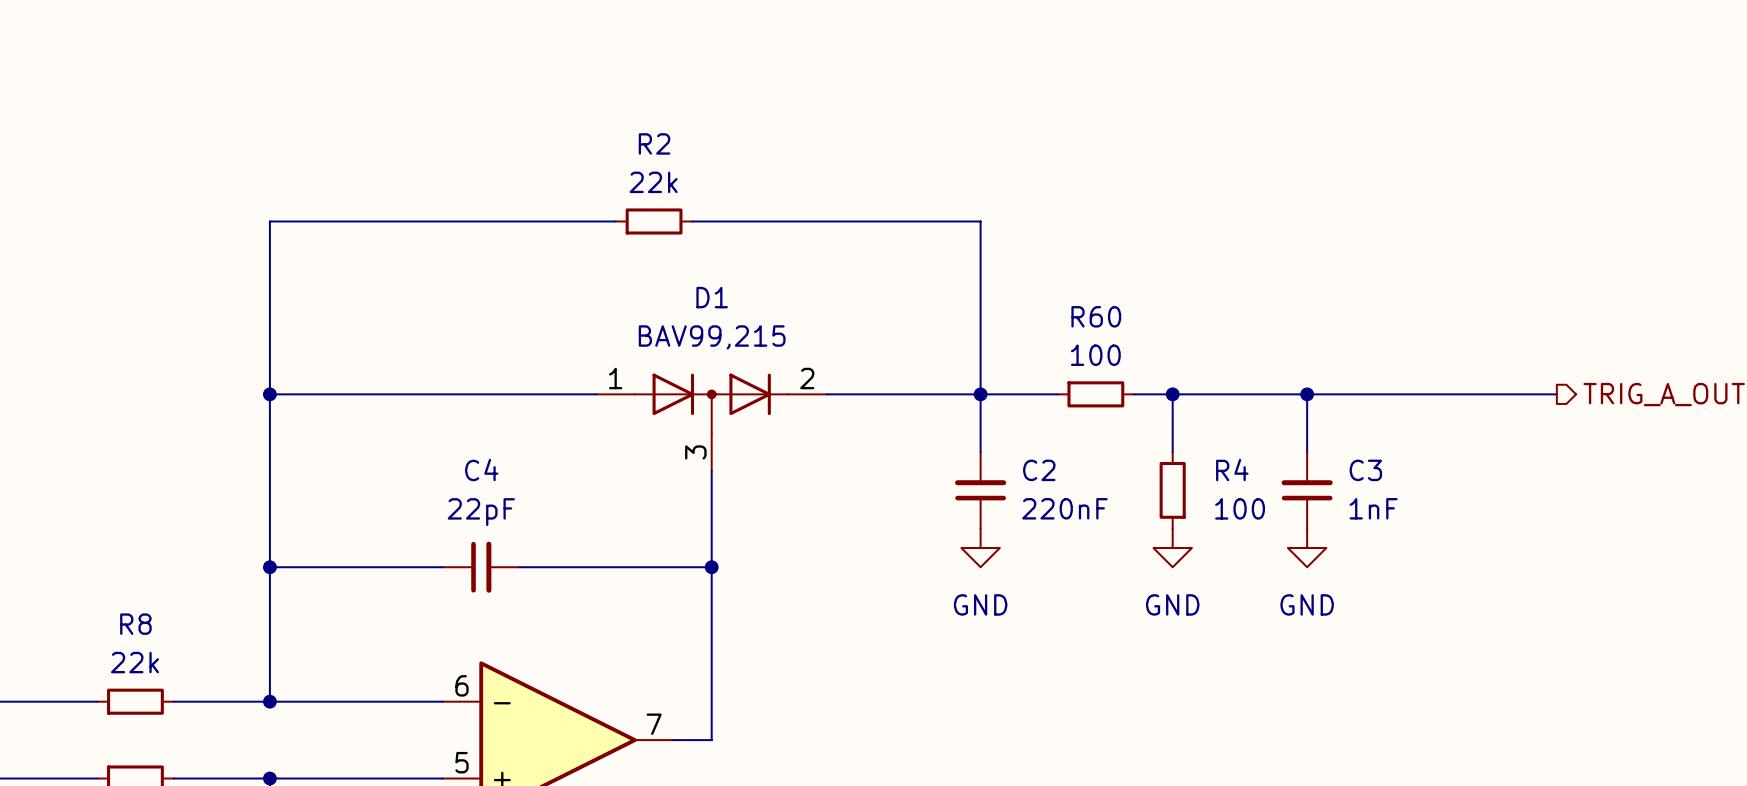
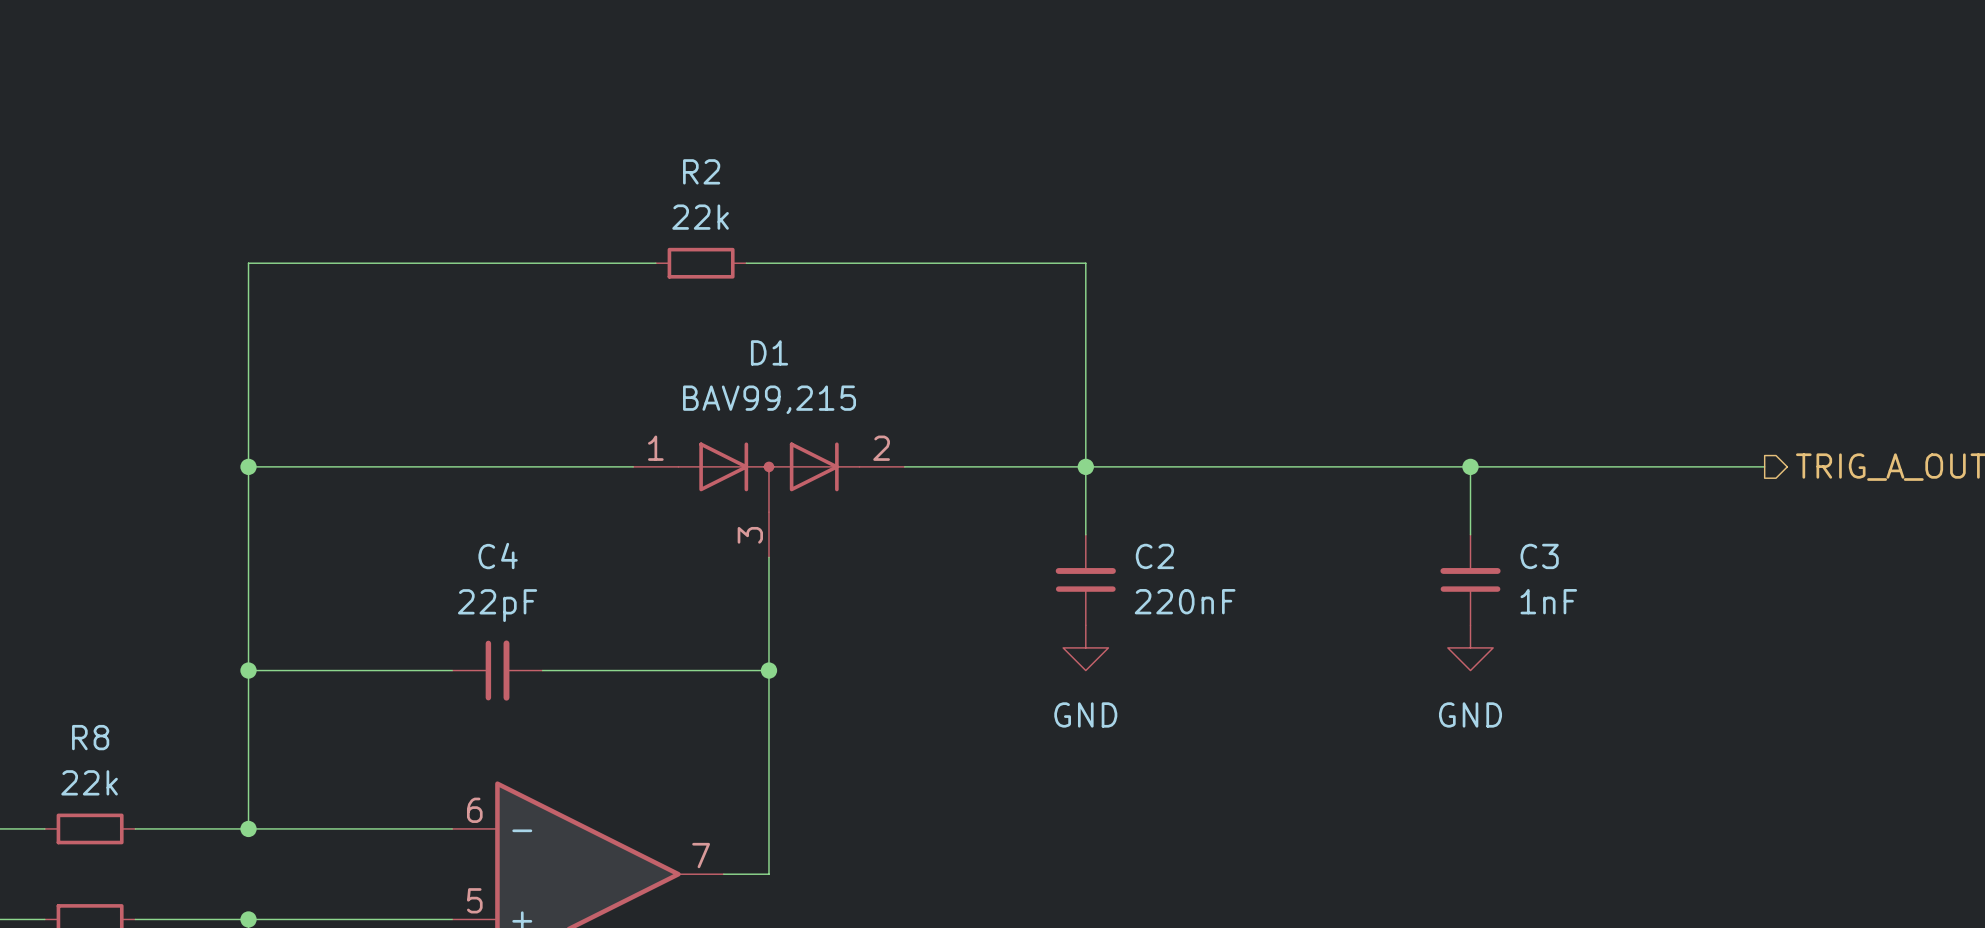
wire: none -> (1176, 466) (1266, 466)
R60: 100 (1095, 394) -> none
wire: (1172, 394) (1172, 451) -> none
junction: (1172, 394) -> none
R4: 100 (1172, 490) -> none
power symbol: GND (1172, 548) -> none

